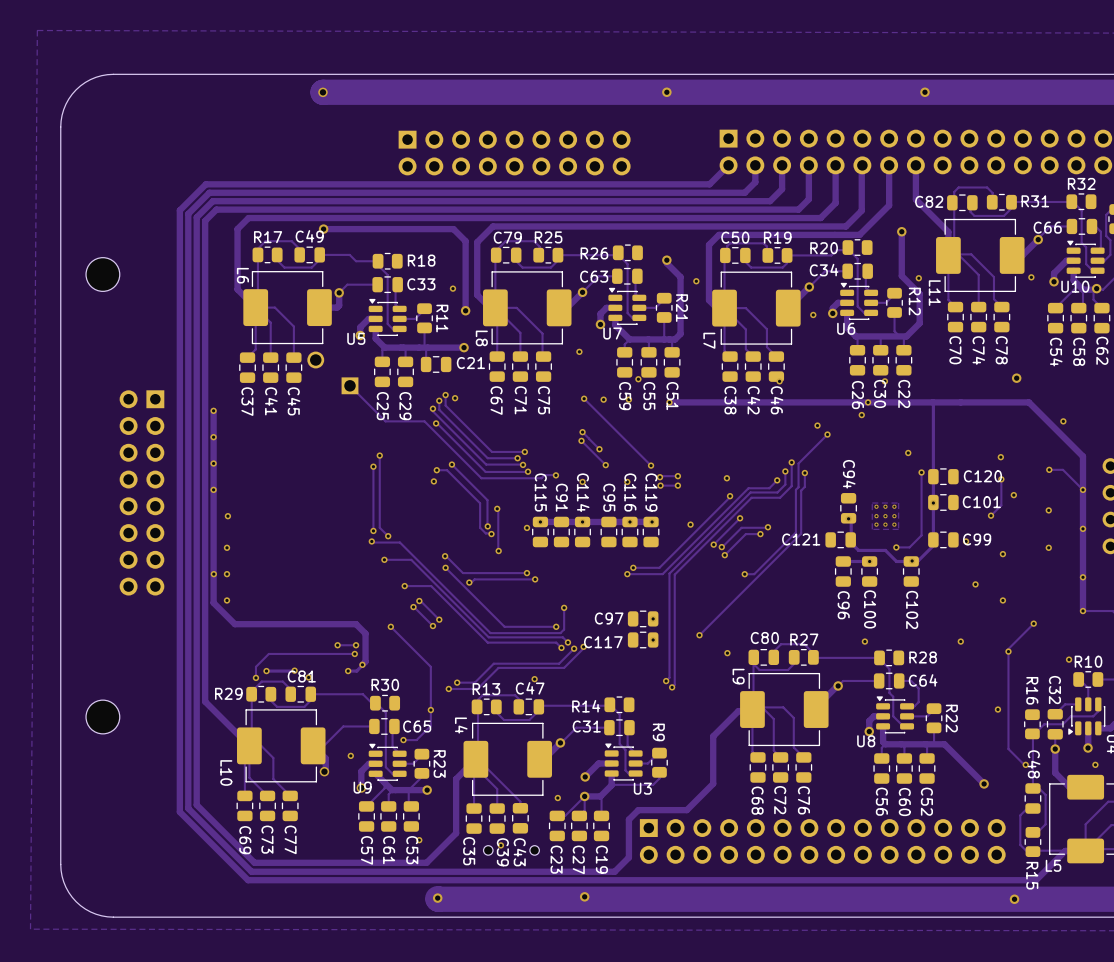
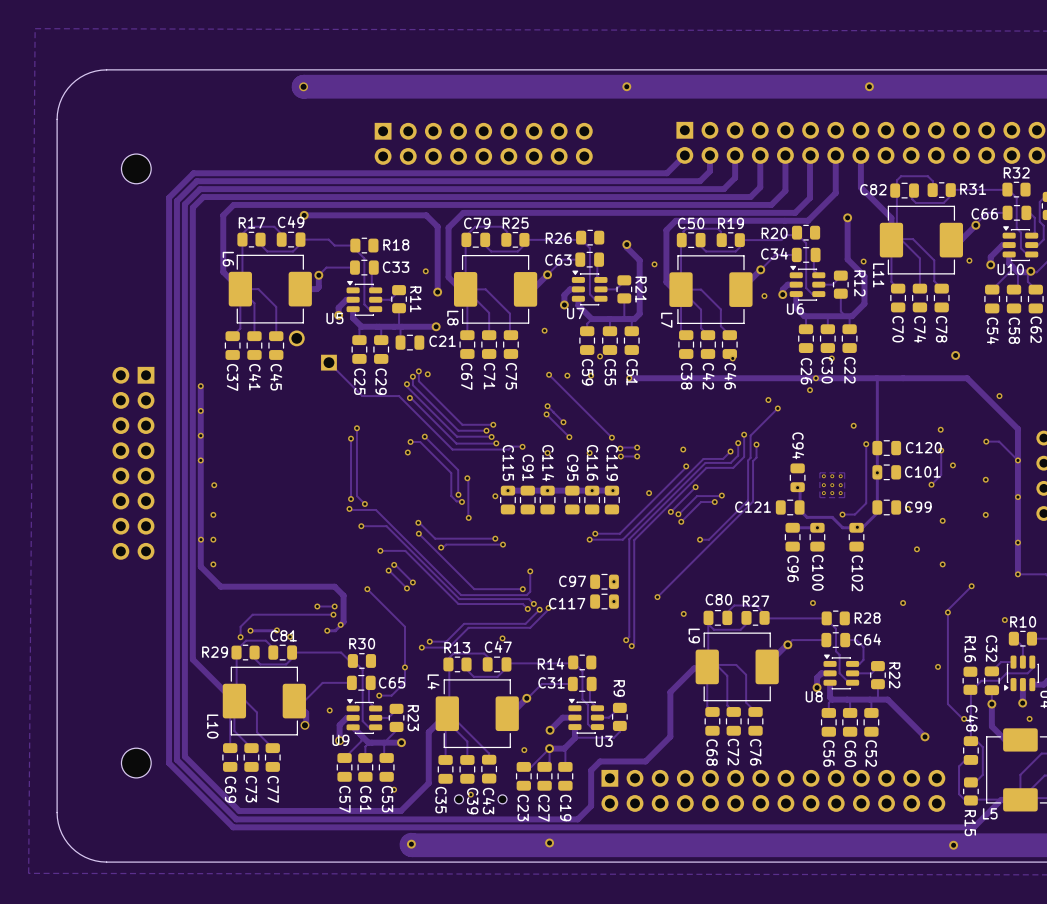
part: none -> (136, 168)
part: (102, 274) -> none
part: (102, 717) -> none
part: none -> (136, 763)

